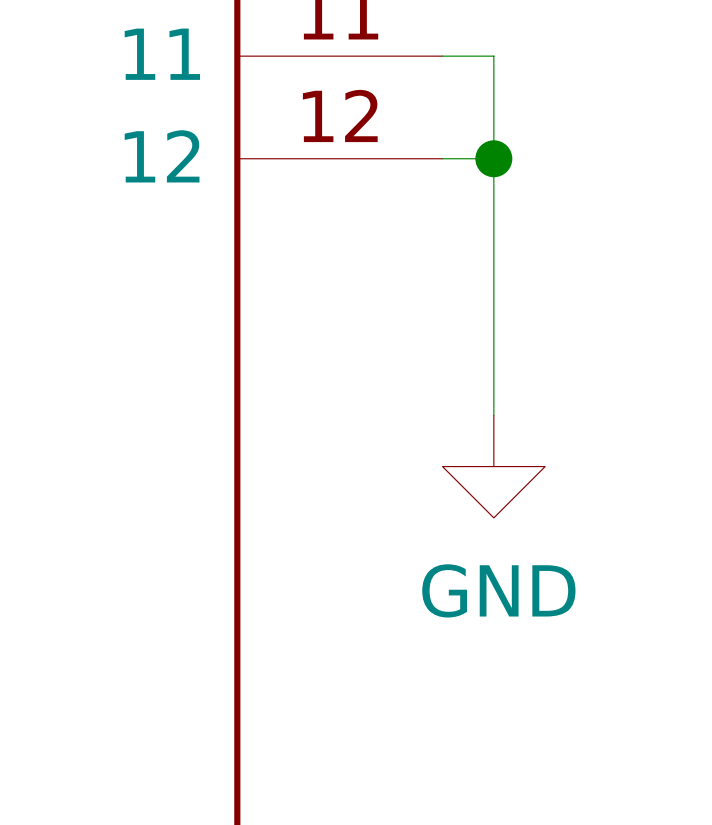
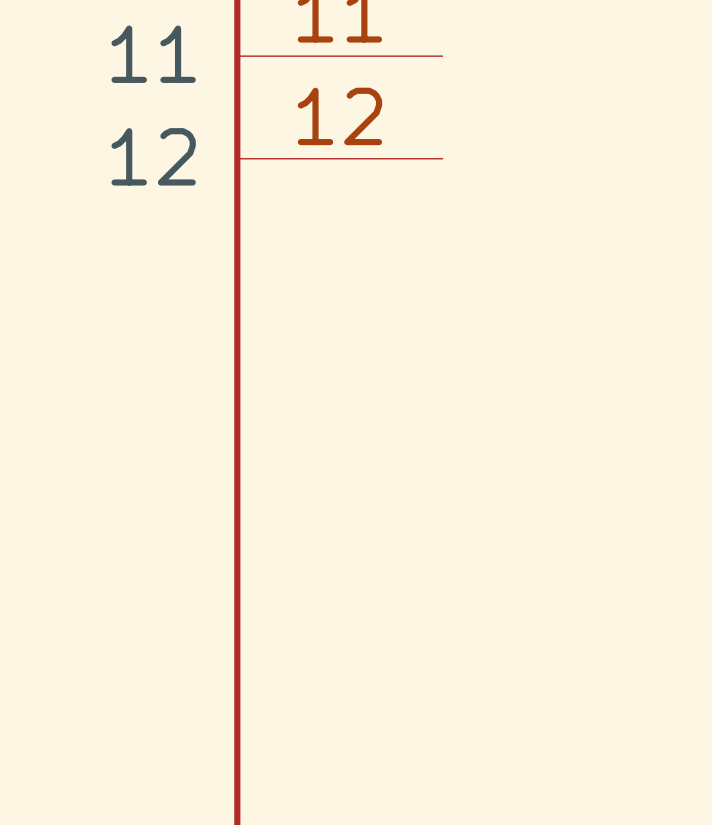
wire: (442, 56) (493, 56) (493, 415) -> none
wire: (442, 158) (493, 158) -> none
junction: (493, 158) -> none
power symbol: GND (493, 466) -> none

